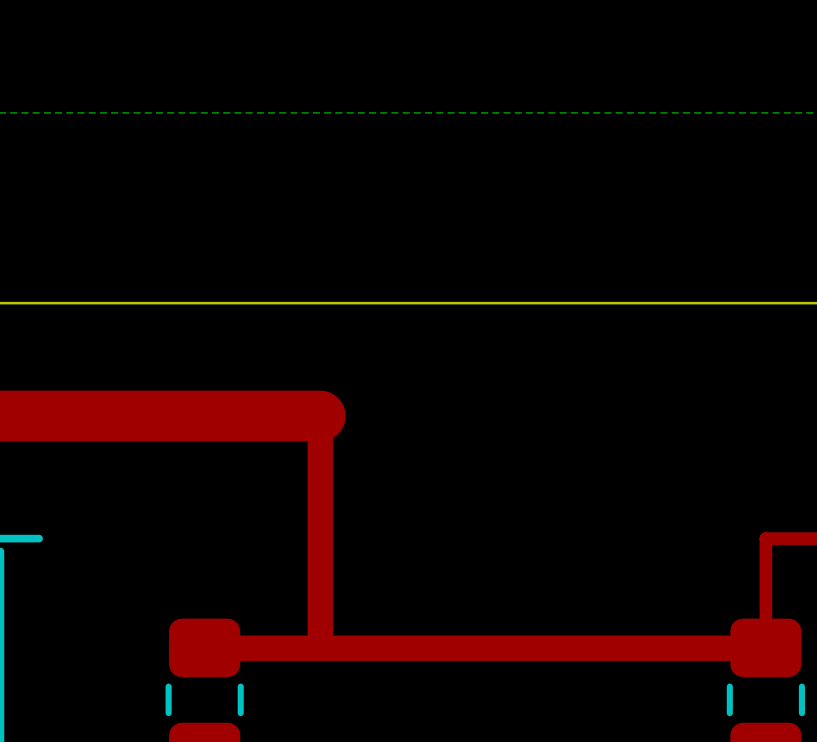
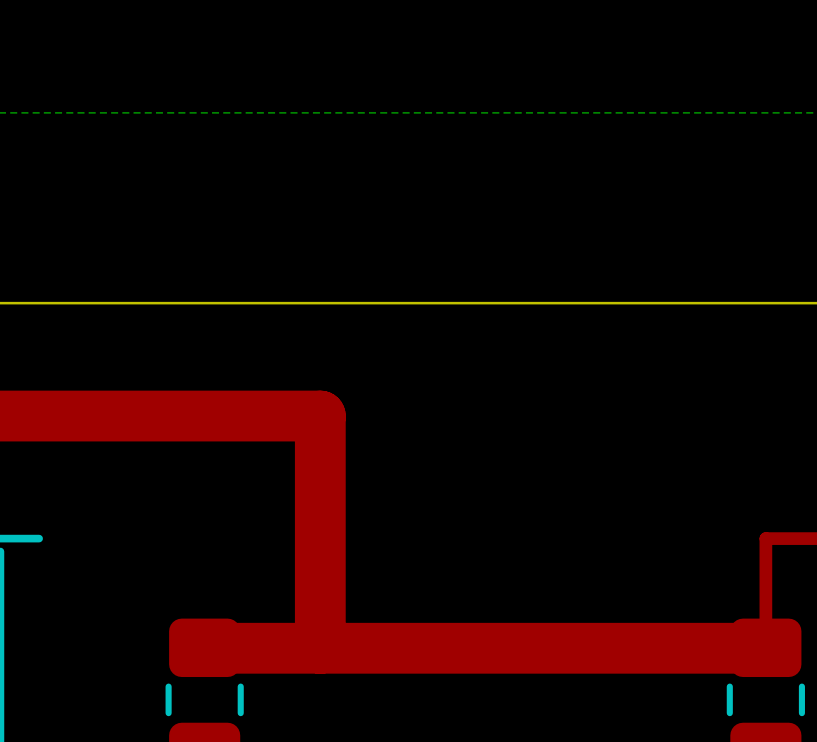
top track width: thin (320, 416) (320, 648) -> thick (320, 416) (320, 648)
top track width: thin (205, 648) (765, 648) -> thick (205, 648) (765, 648)

